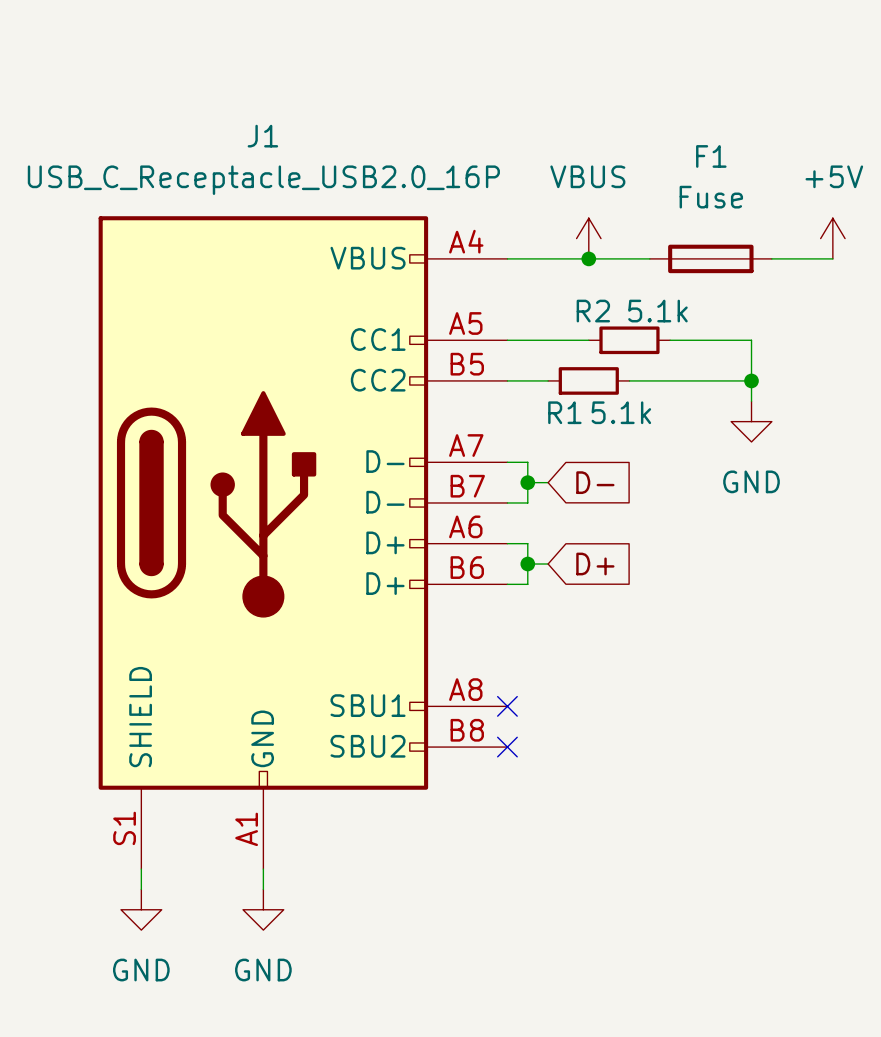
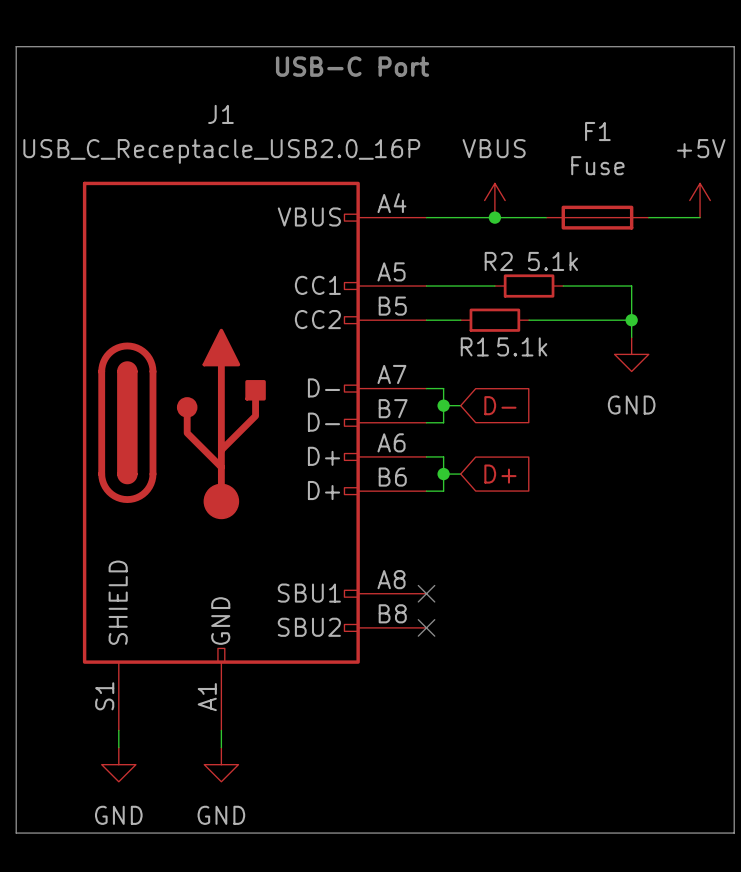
line: none -> (16, 46) (734, 46) (734, 833) (16, 833) (16, 46)
text: none -> USB-C Port (352, 66)

